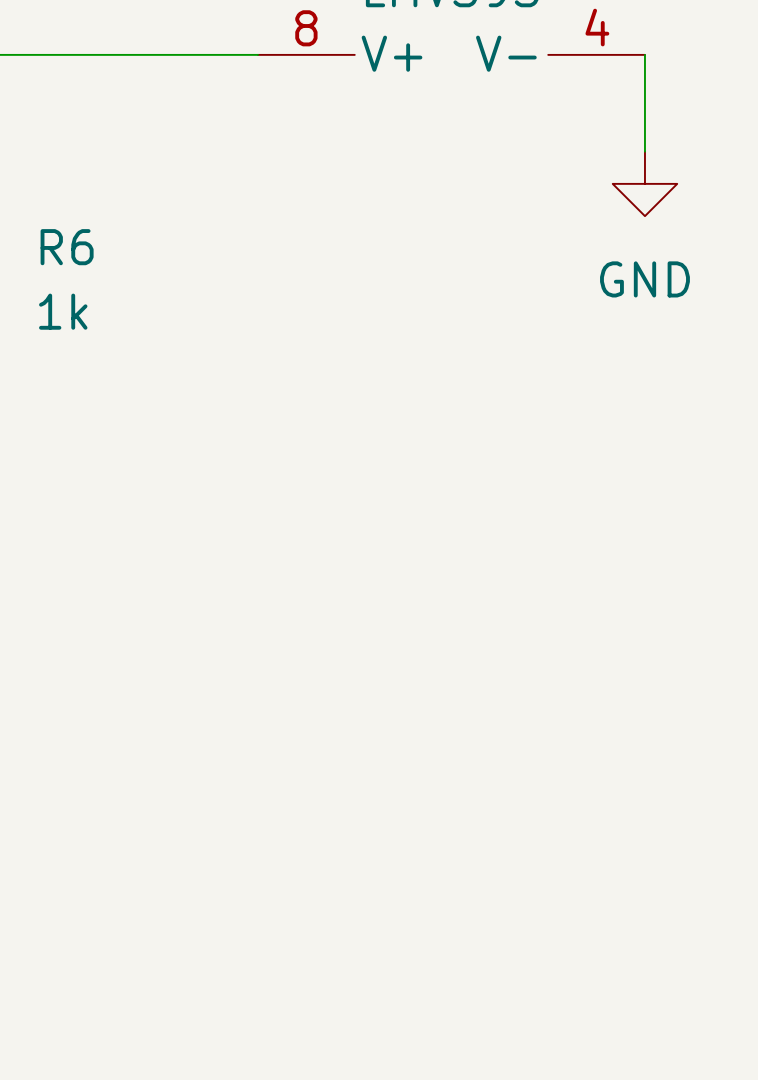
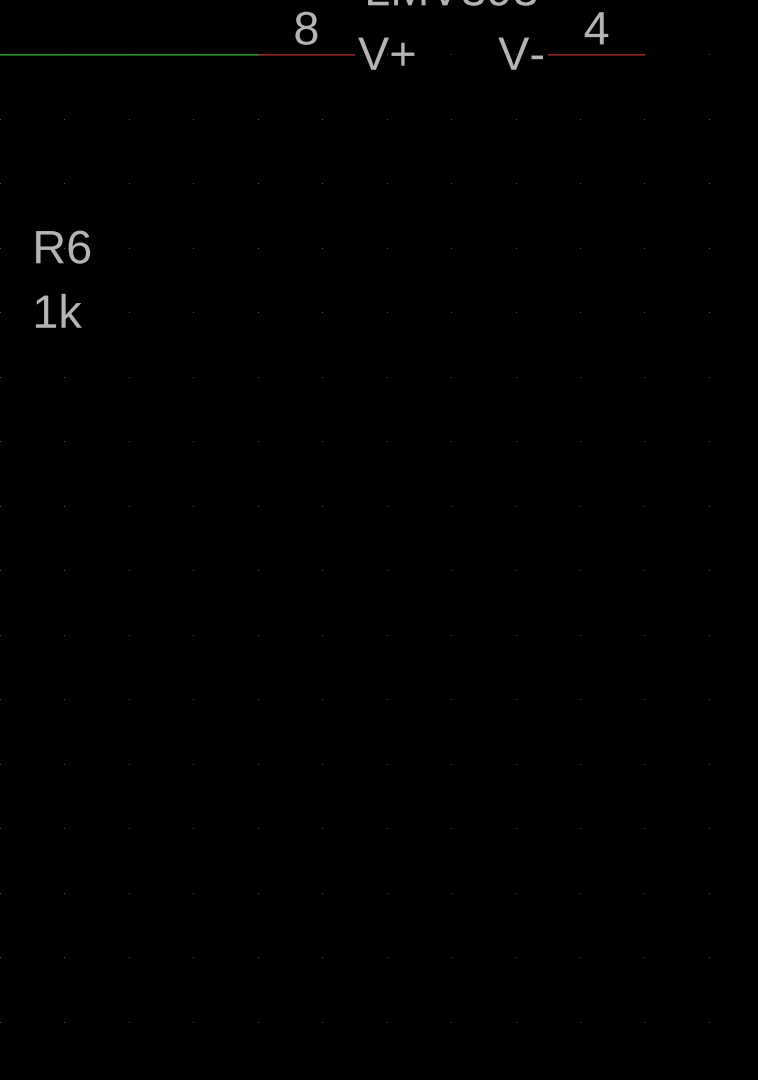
wire: (644, 54) (644, 151) -> none
power symbol: GND (644, 183) -> none

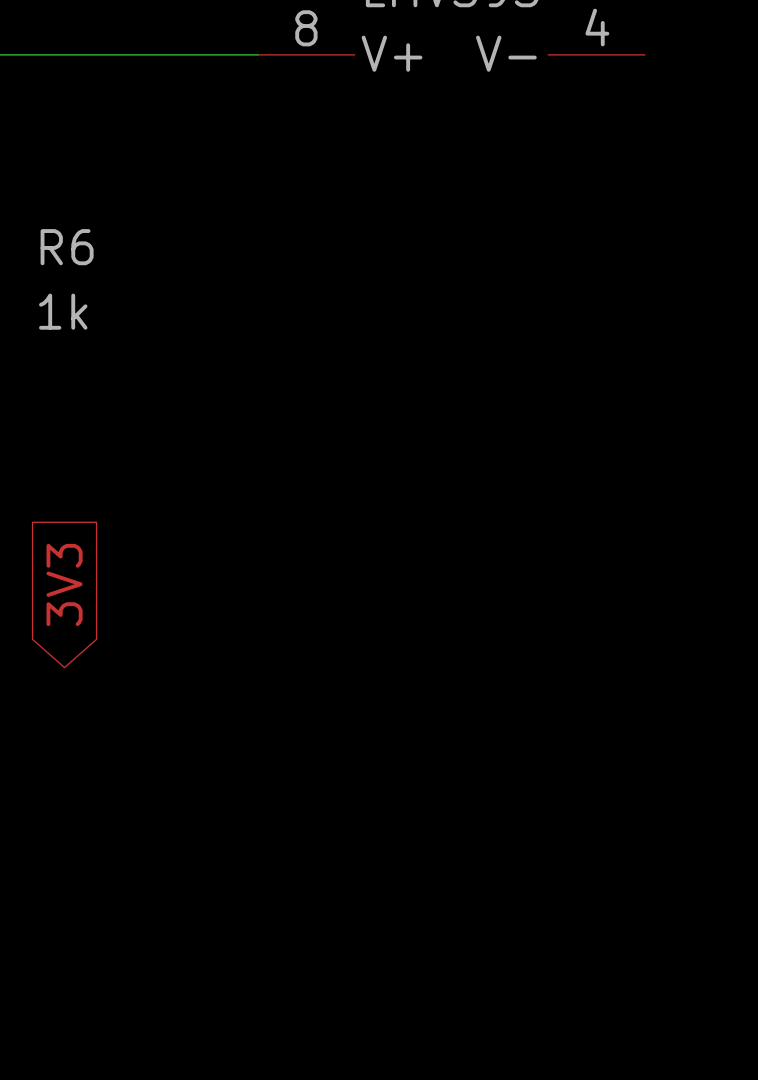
global label: none -> 3V3 (64, 584)

